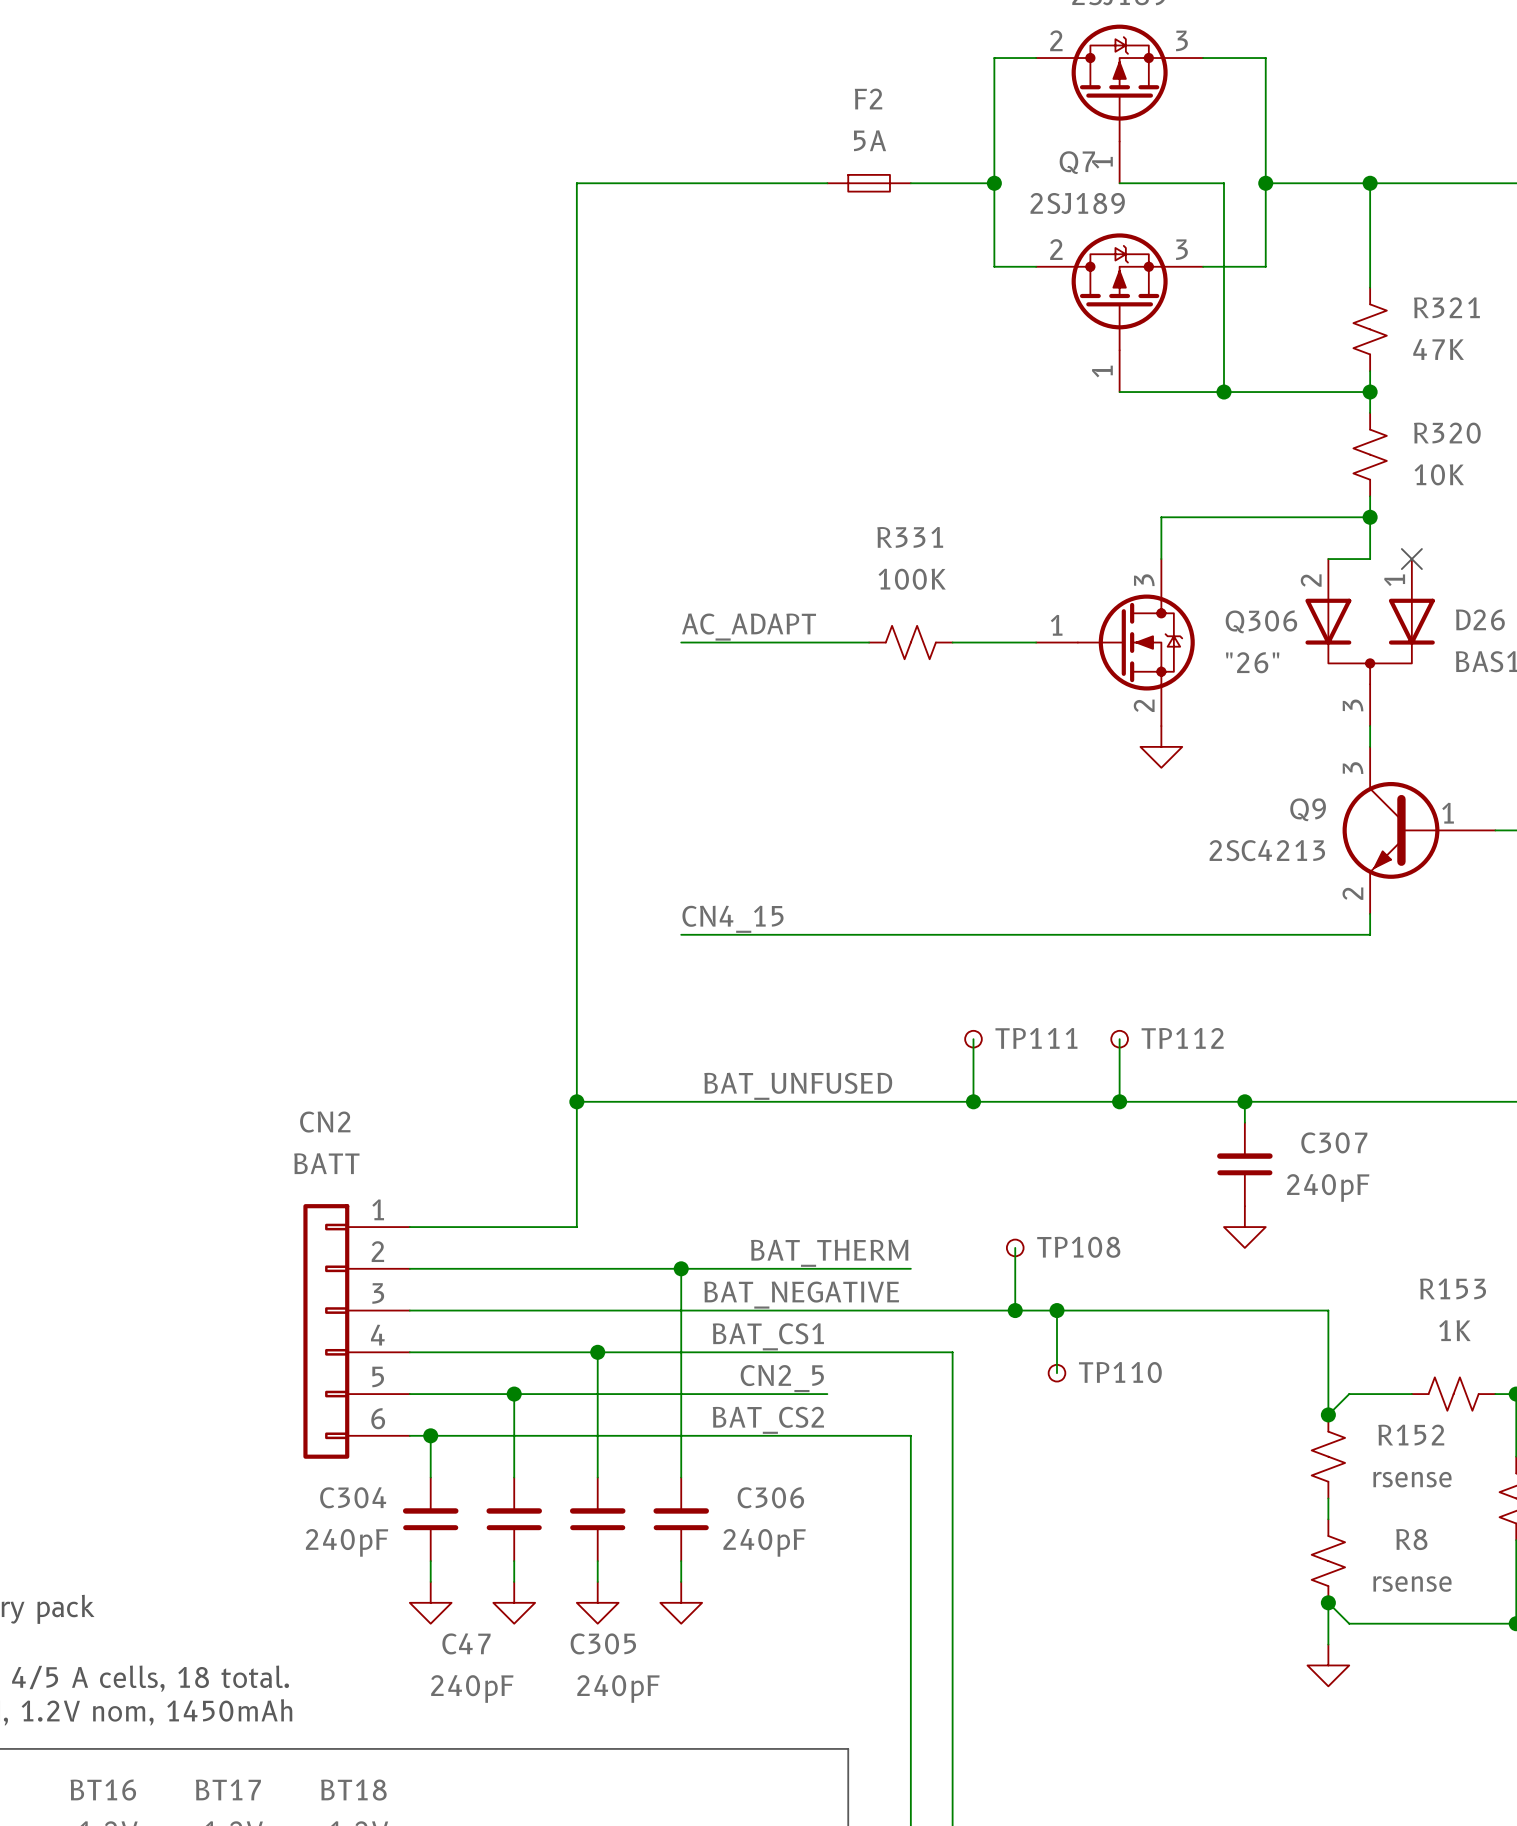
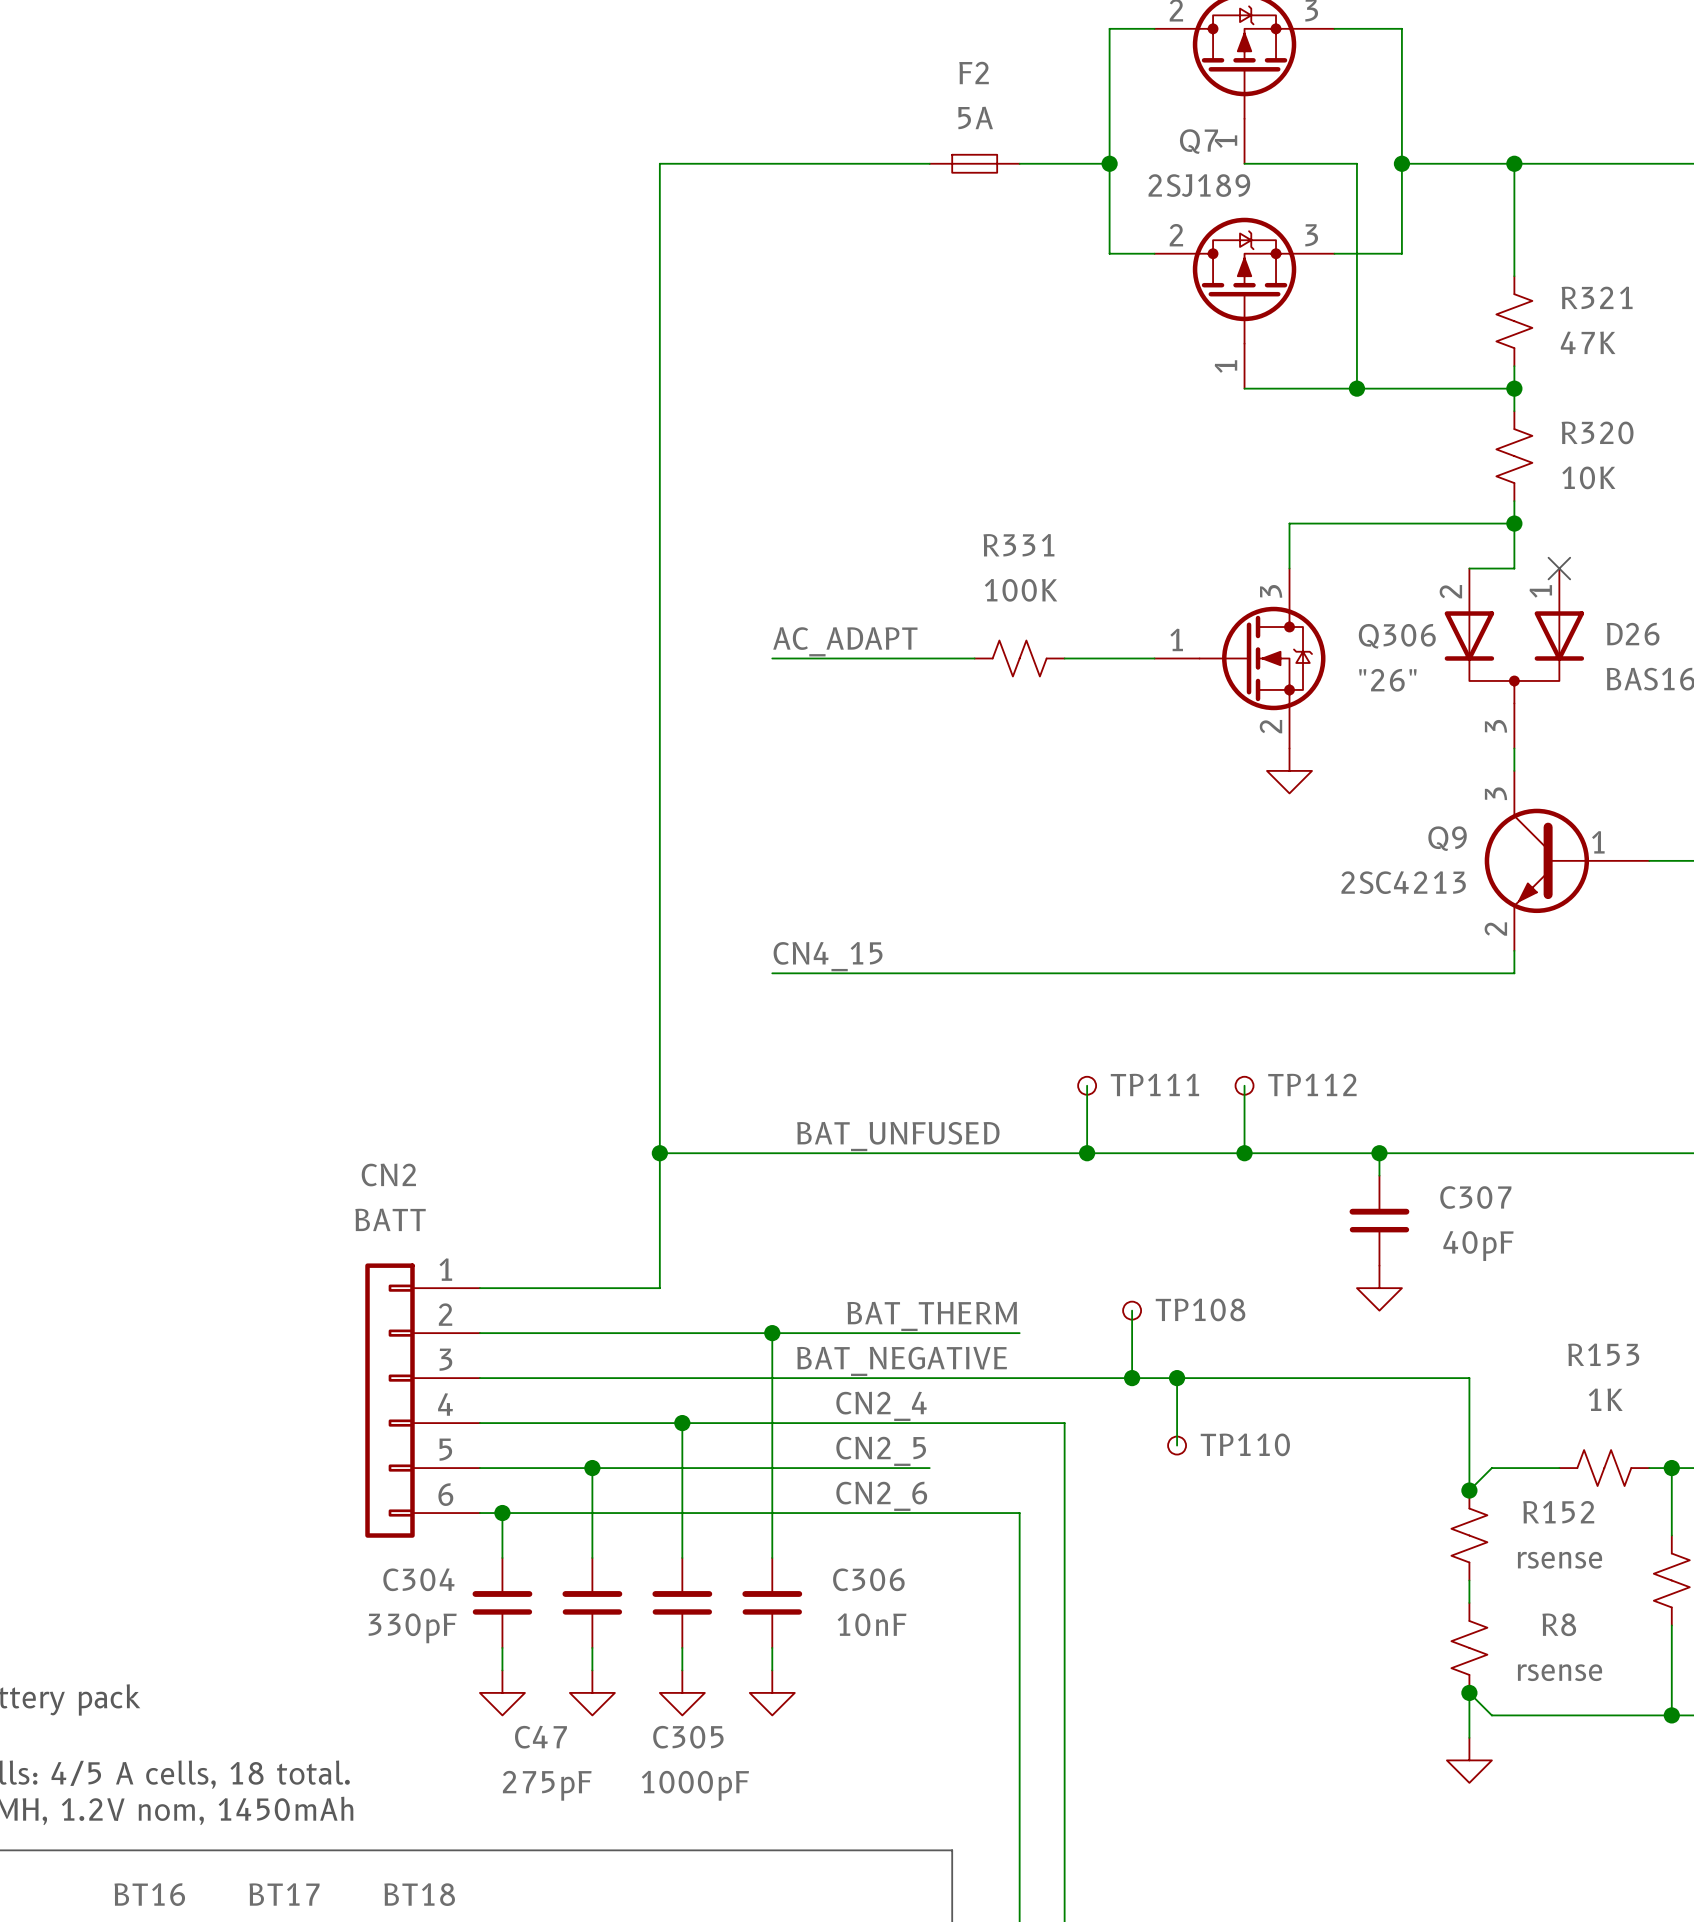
C307 value: 240pF (1328, 1187) -> 40pF (1478, 1246)
label: BAT_CS1 (768, 1336) -> CN2_4 (881, 1406)
label: BAT_CS2 (768, 1420) -> CN2_6 (881, 1496)
C304 value: 240pF (347, 1542) -> 330pF (412, 1628)
C306 value: 240pF (764, 1542) -> 10nF (872, 1624)
C47 value: 240pF (472, 1688) -> 275pF (547, 1785)
C305 value: 240pF (618, 1688) -> 1000pF (695, 1785)

